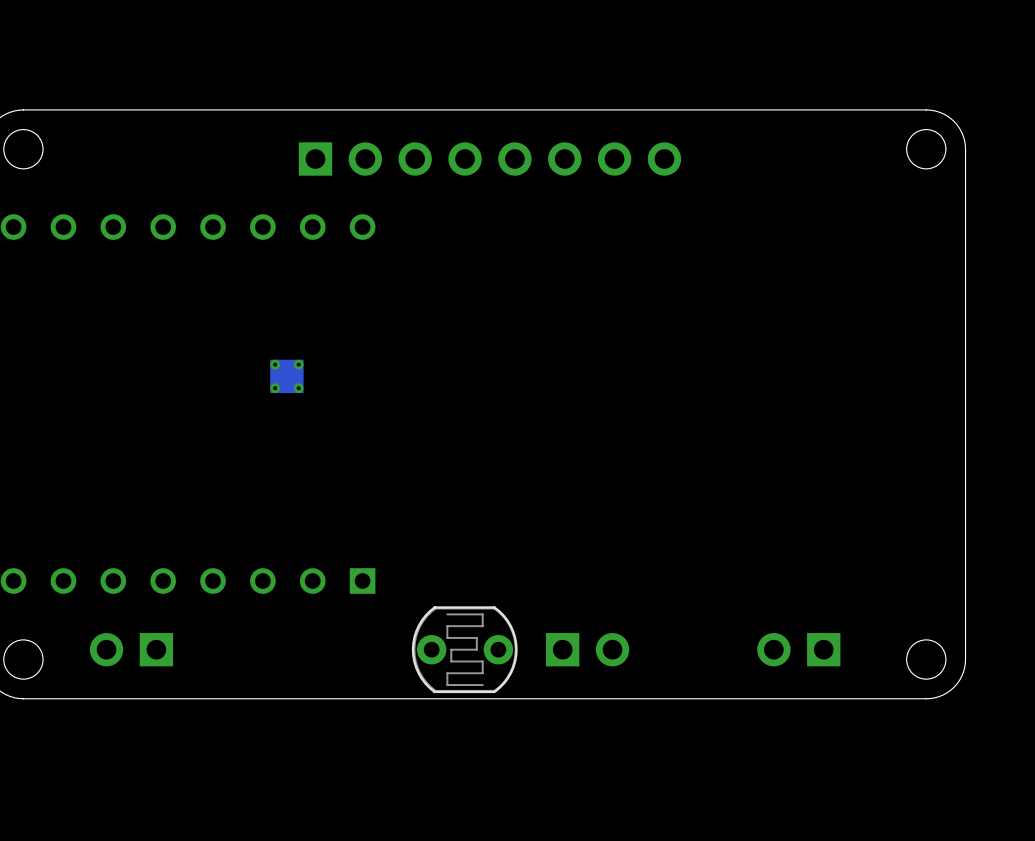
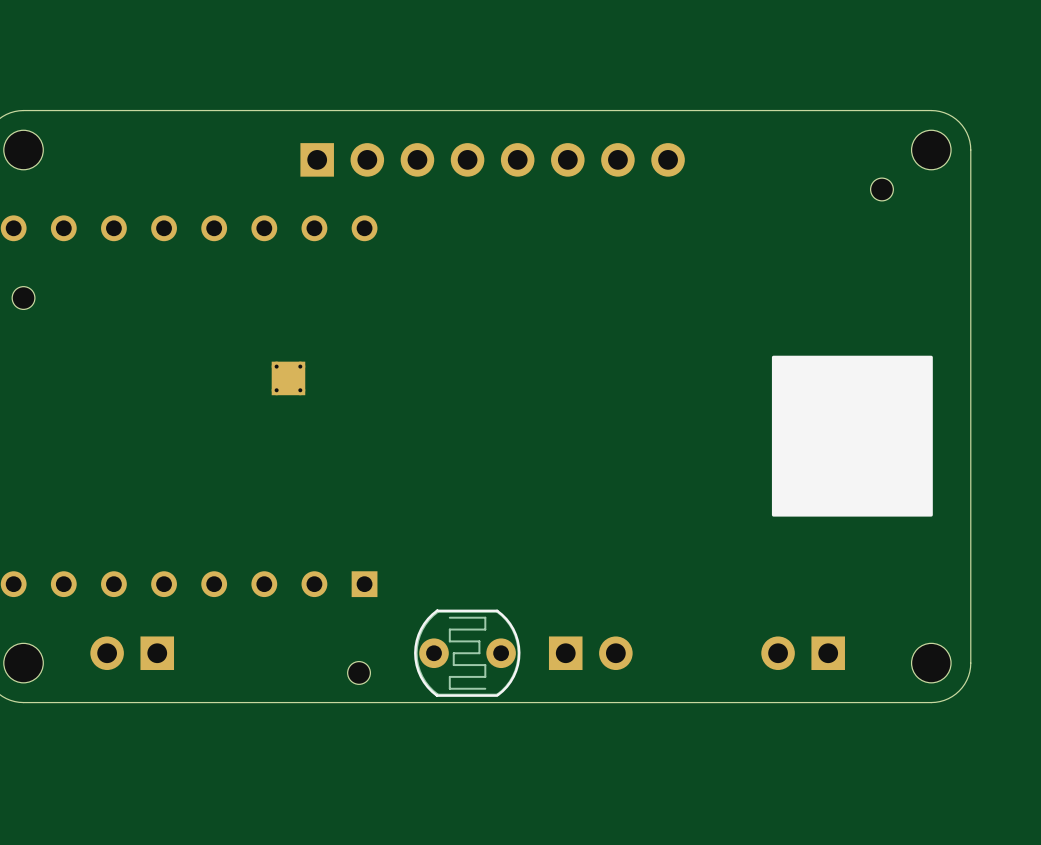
part: none -> (881, 189)
part: none -> (23, 298)
drawing: none -> [771, 355, 933, 517]
part: none -> (359, 672)

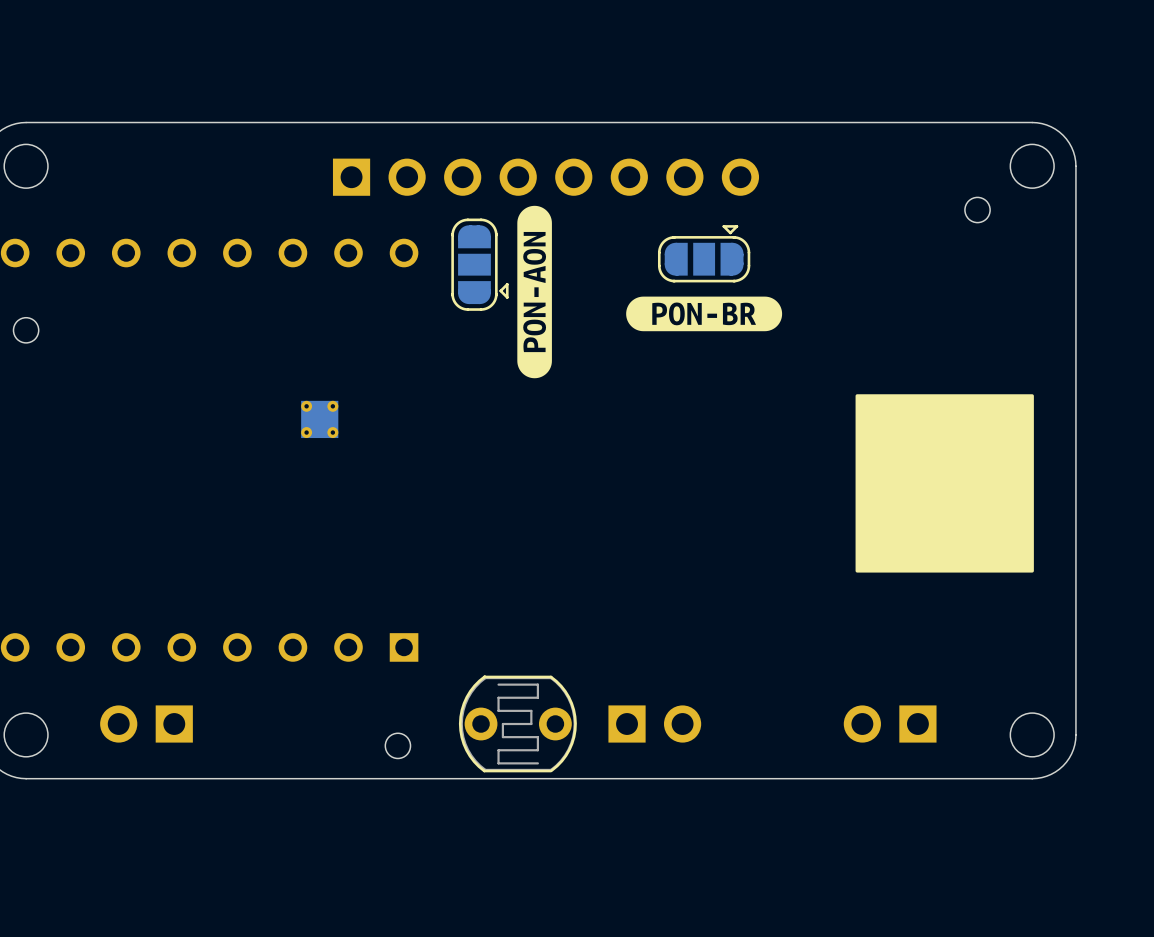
drawing: none -> [517, 205, 552, 379]
part: none -> (704, 253)
part: none -> (479, 264)
drawing: none -> [626, 296, 783, 332]

